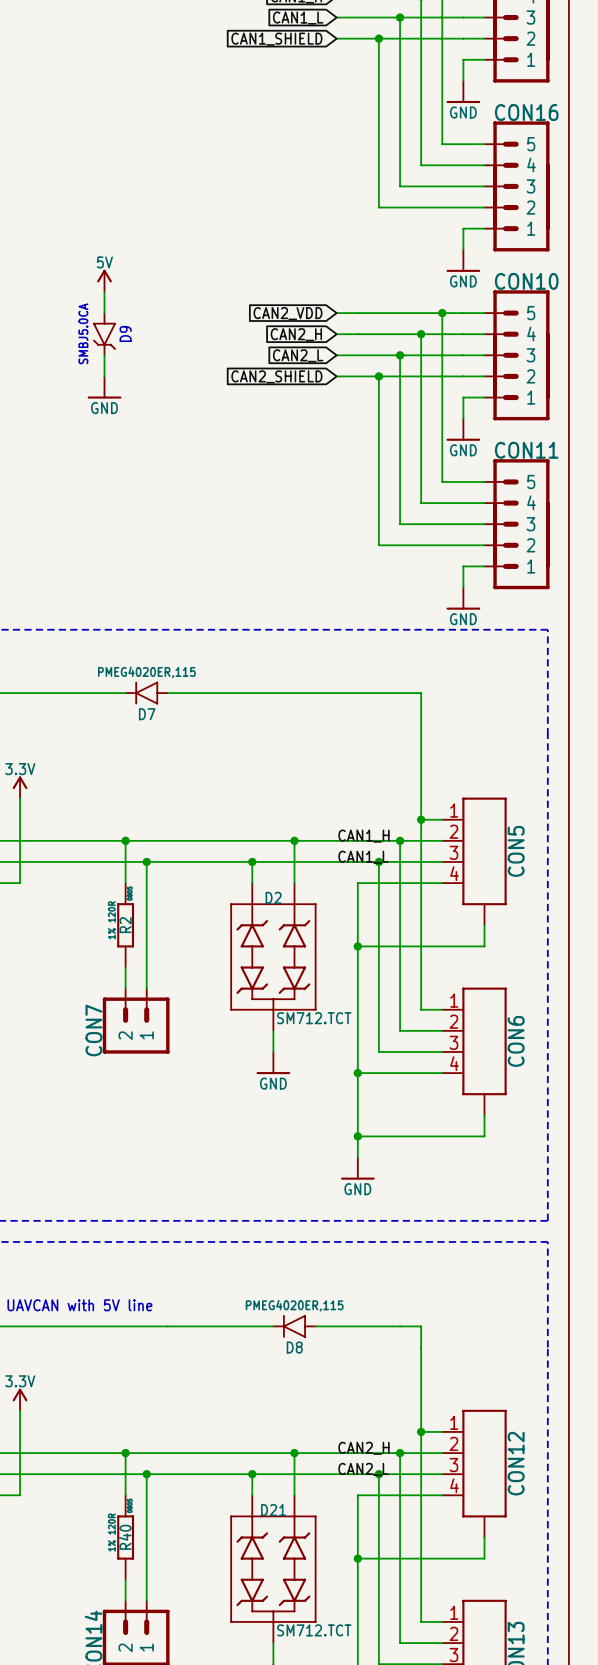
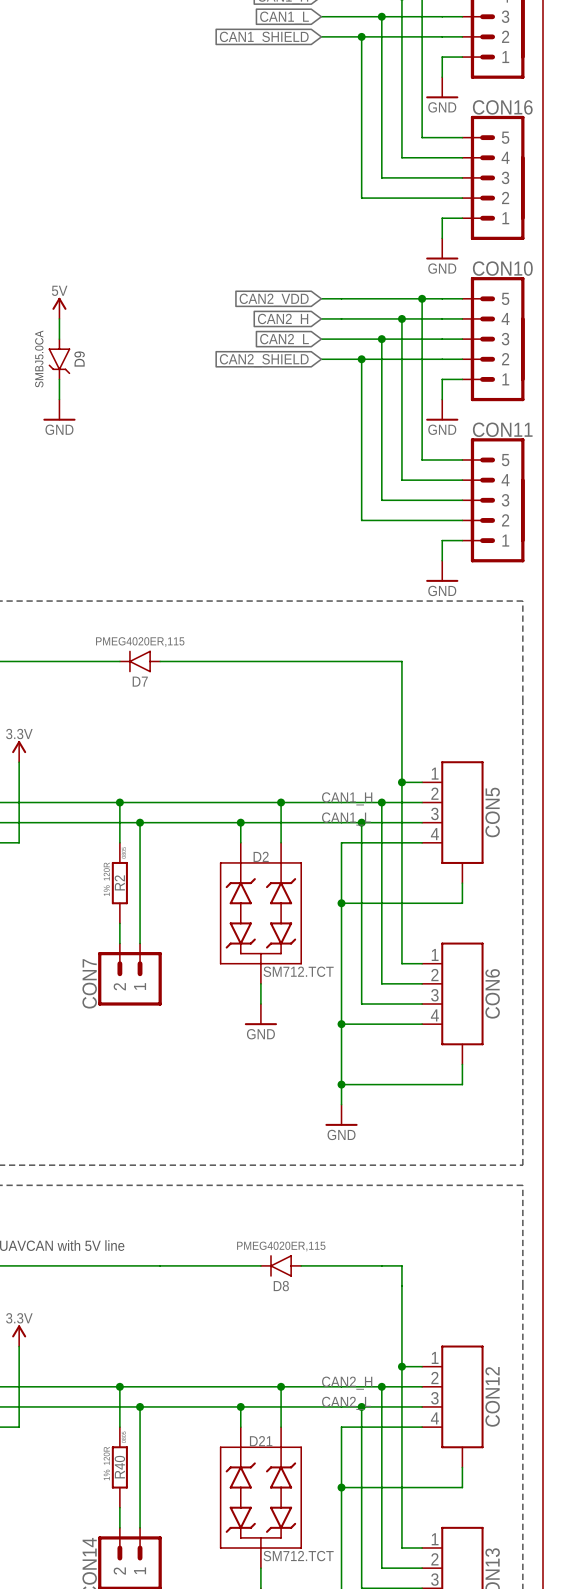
power symbol position: 5V (104, 280) -> 5V (59, 308)
wire: (104, 291) (104, 313) -> (59, 379) (59, 399)
D9 position: (104, 334) -> (59, 359)
wire: (104, 355) (104, 376) -> (59, 318) (59, 339)
power symbol position: GND (104, 387) -> GND (59, 410)

